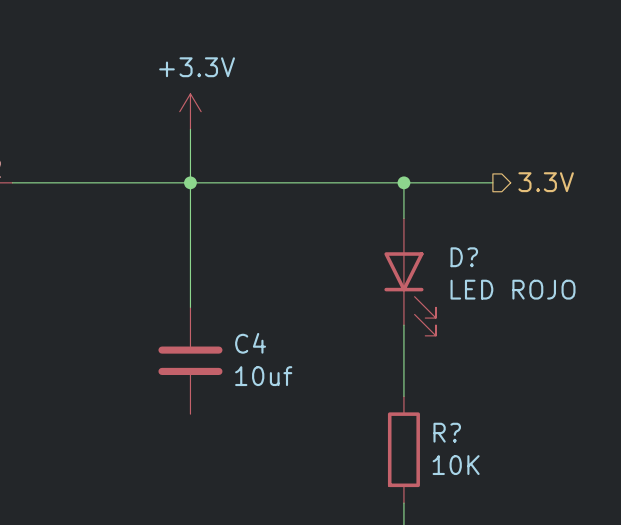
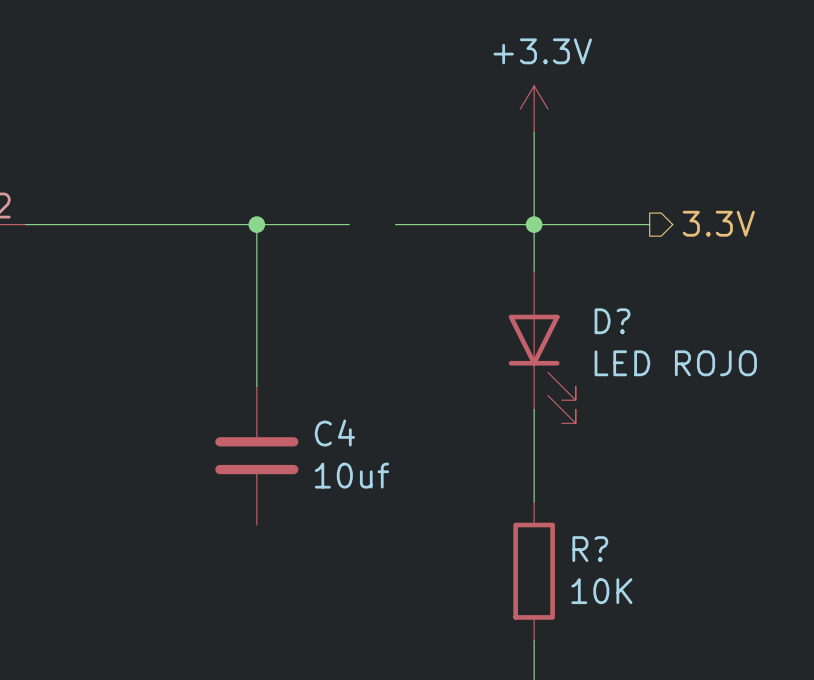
power symbol position: +3.3V (190, 111) -> +3.3V (534, 109)
wire: none -> (534, 132) (534, 224)
wire: (190, 129) (190, 182) -> none
wire: (261, 182) (297, 182) -> none

